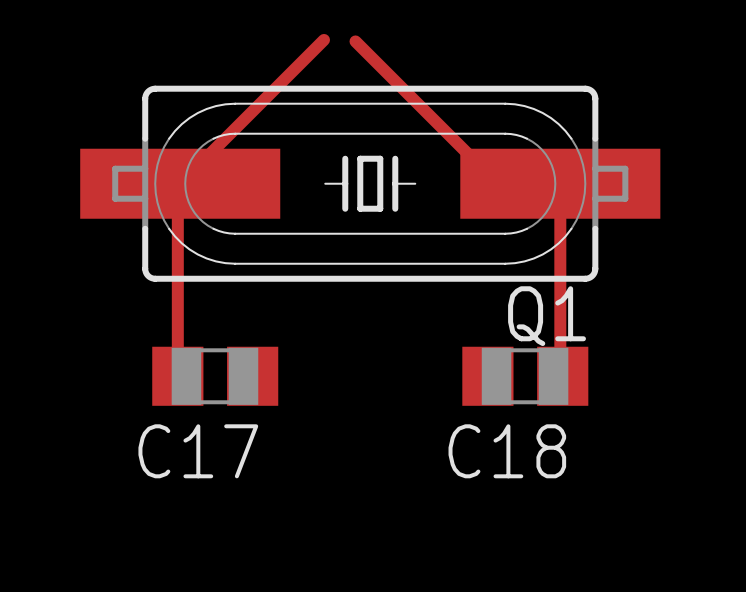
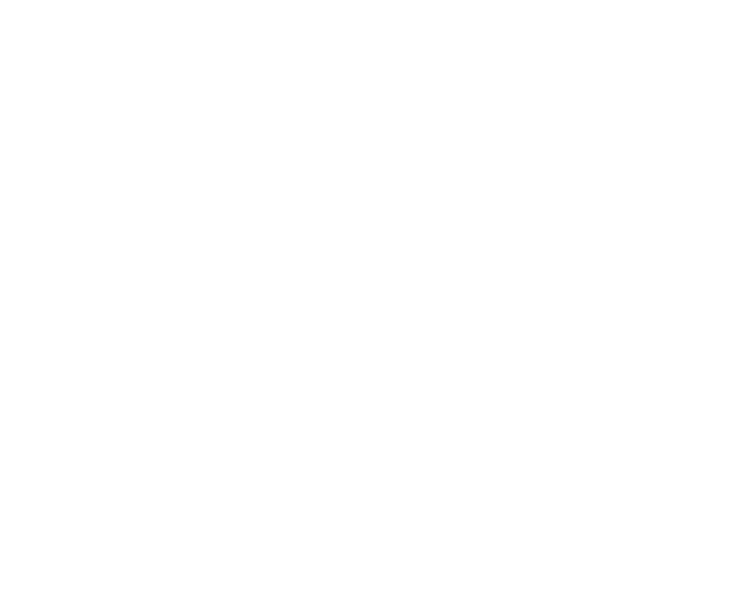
top track: (324, 39) (177, 186) (177, 376) -> none
top track: (355, 41) (497, 183) (560, 183) (560, 373) (562, 376) -> none
Q1: (370, 183) -> none
C17: (215, 376) -> none
C18: (525, 376) -> none

